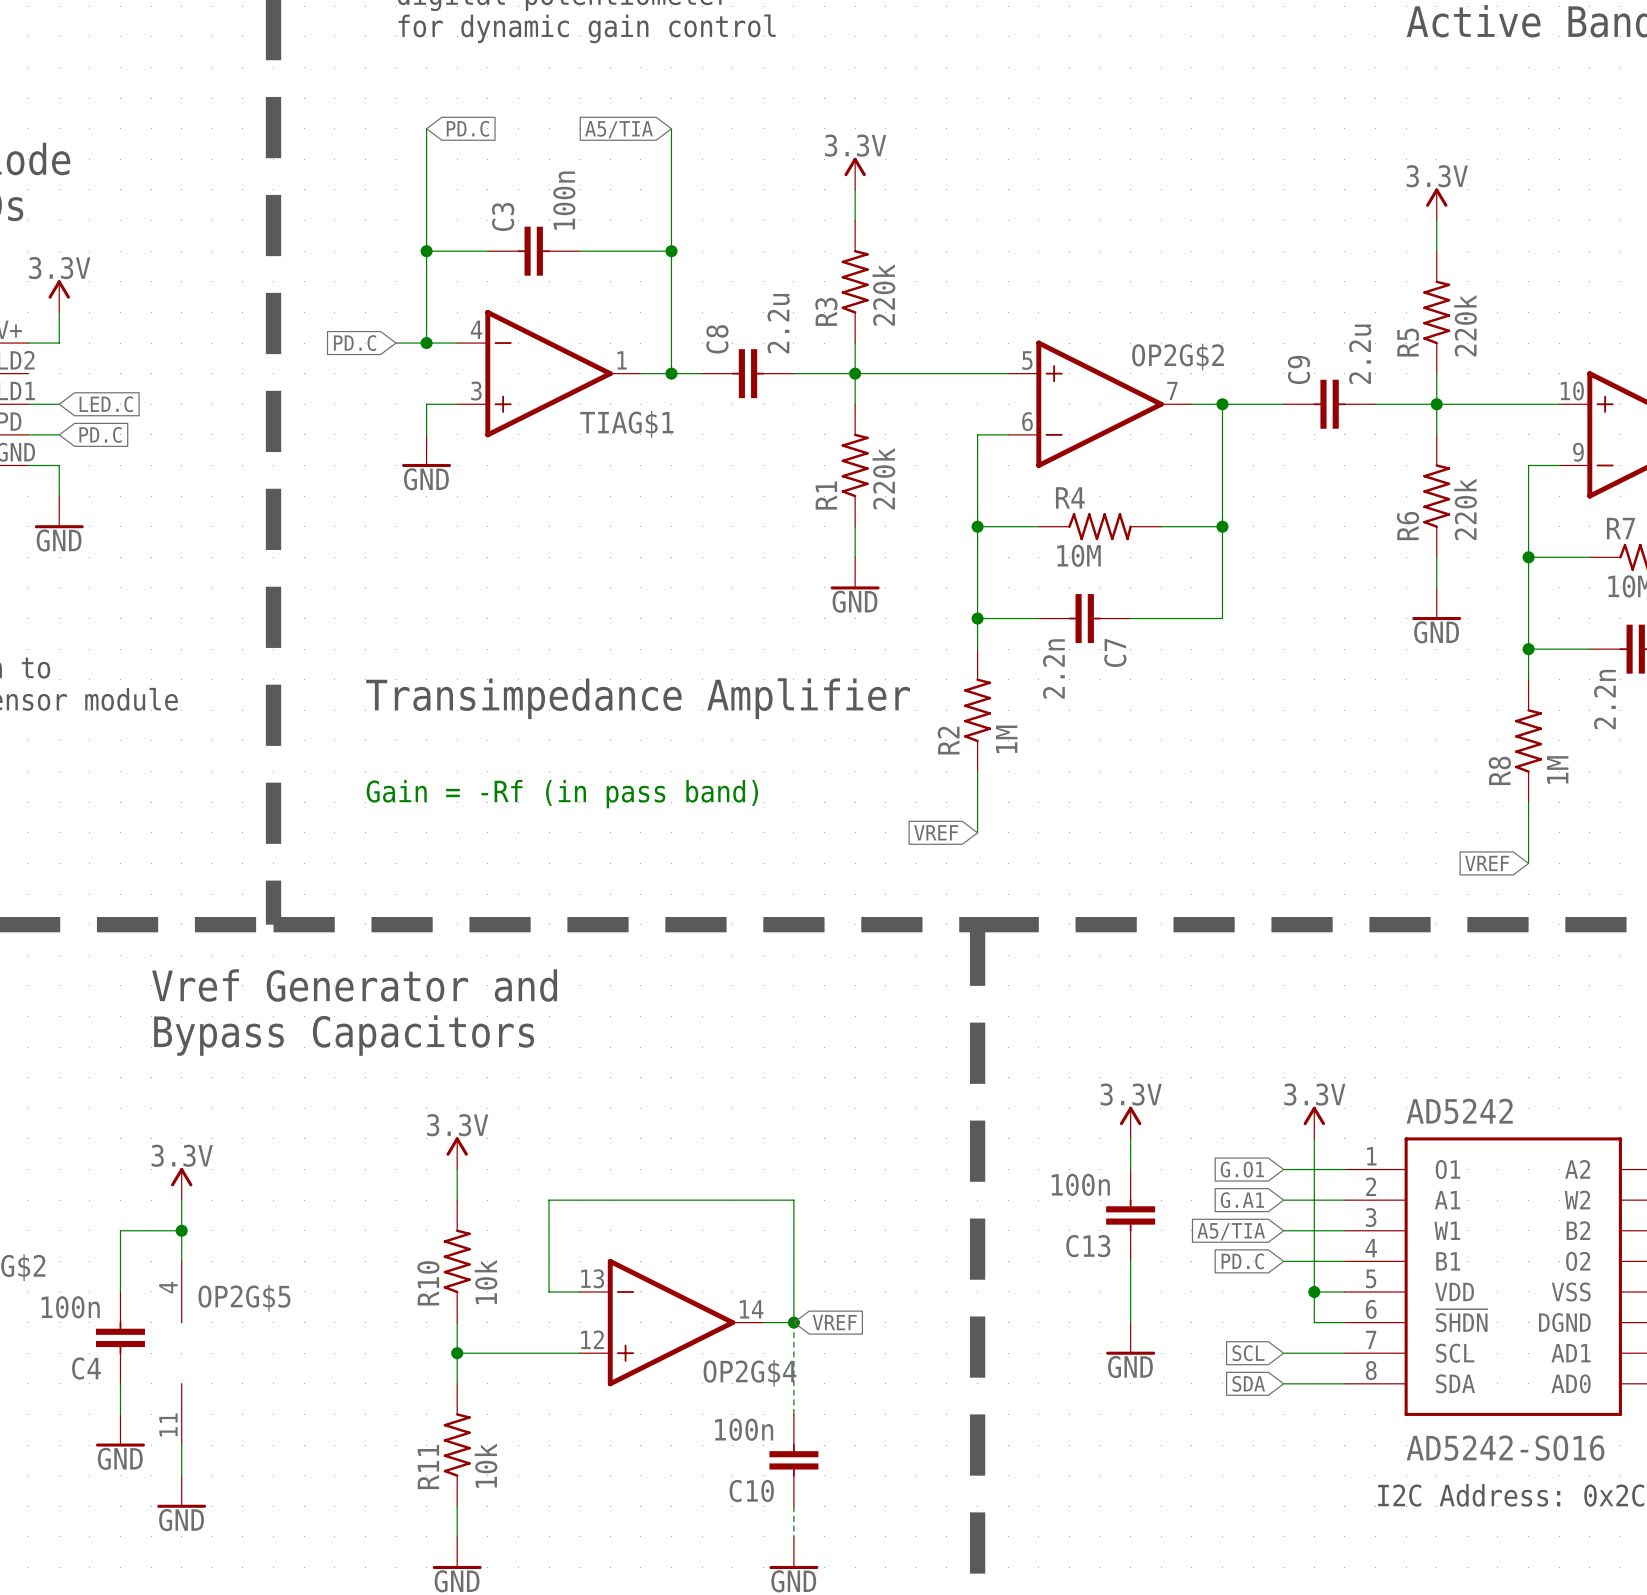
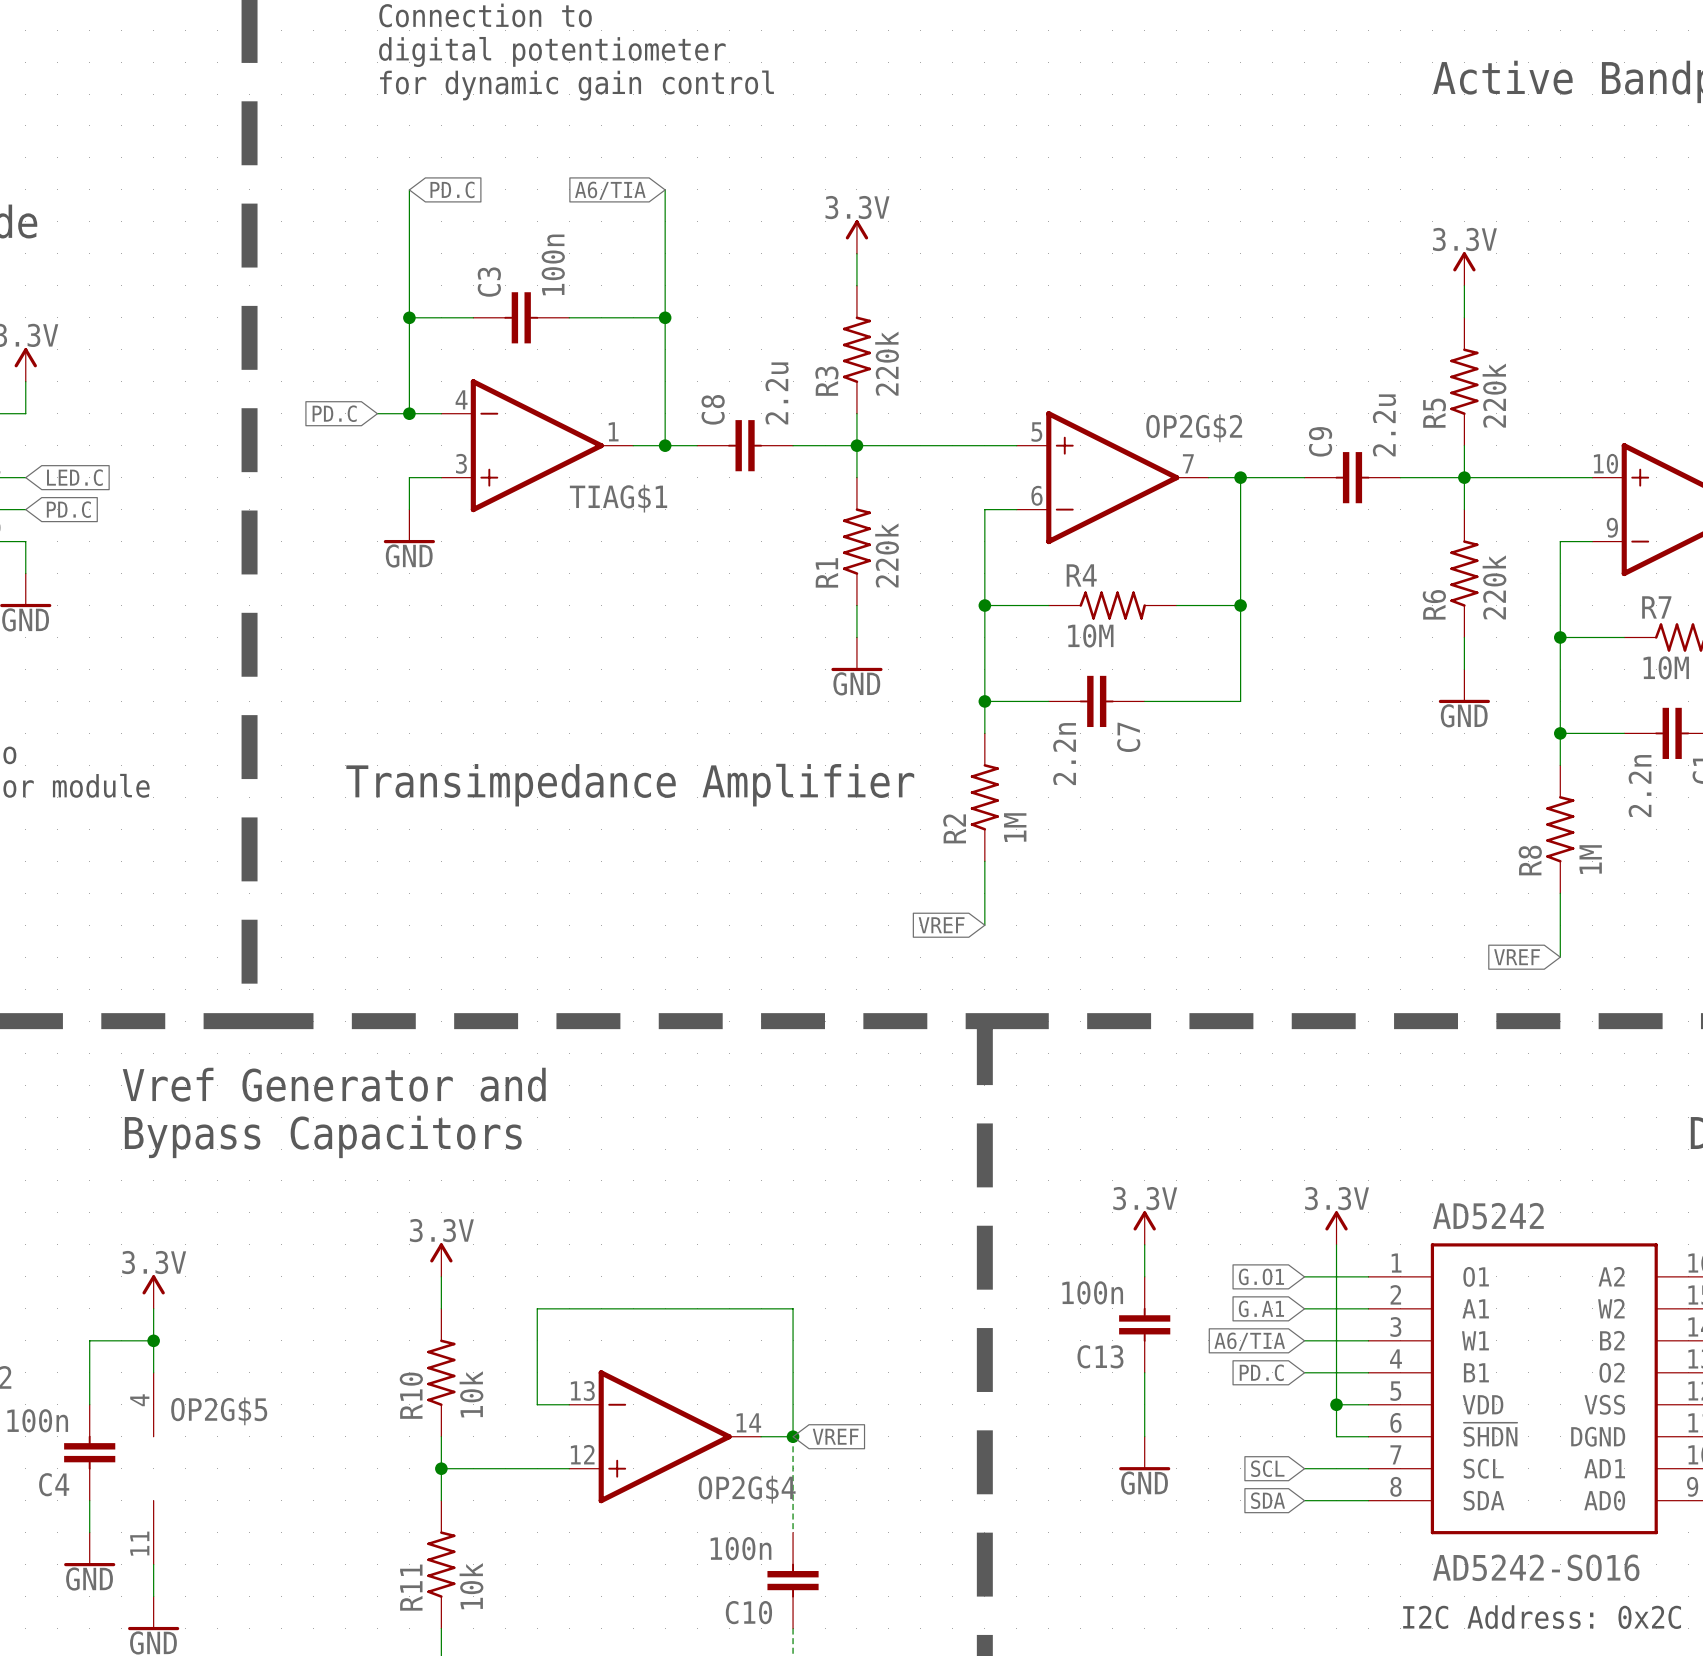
global label: A5/TIA (618, 129) -> A6/TIA (610, 190)
text: Gain = -Rf (in pass band) (562, 794) -> none
global label: A5/TIA (1231, 1231) -> A6/TIA (1249, 1341)

